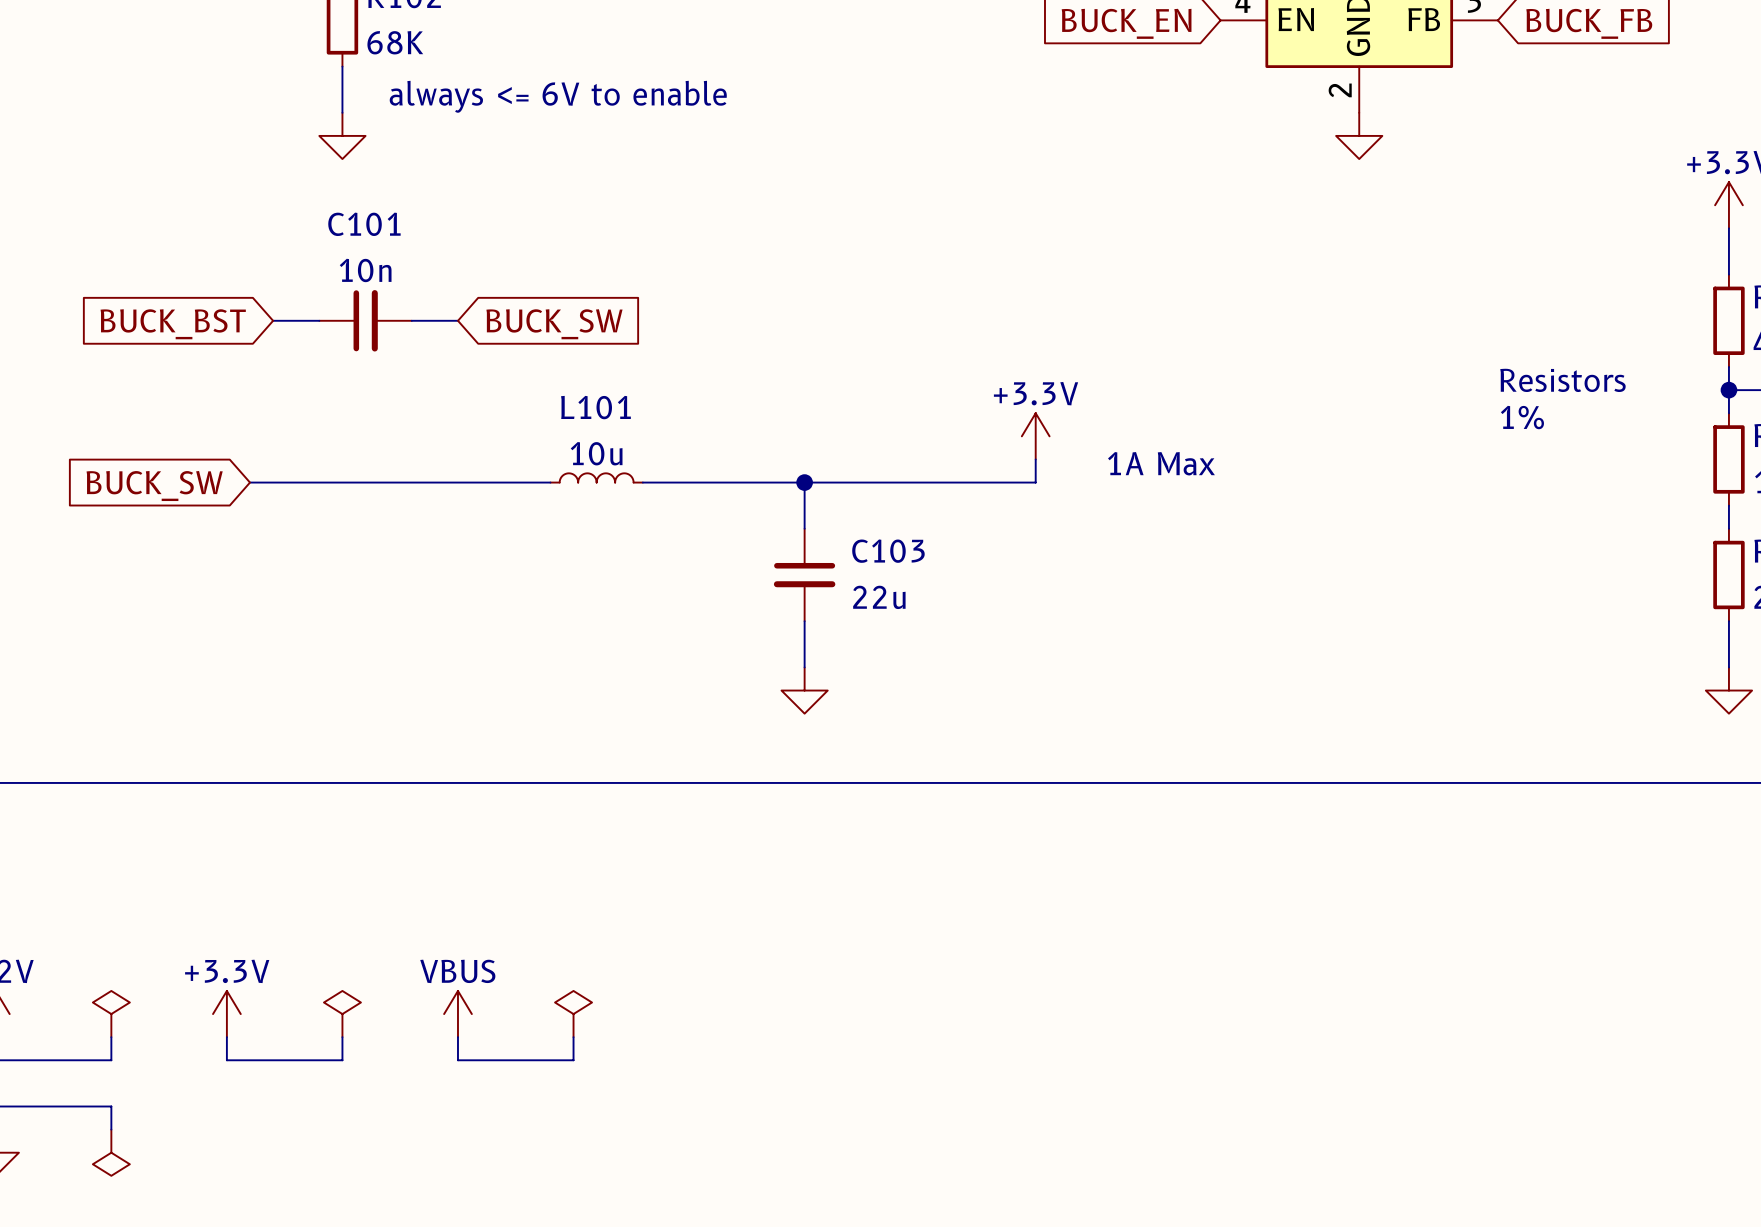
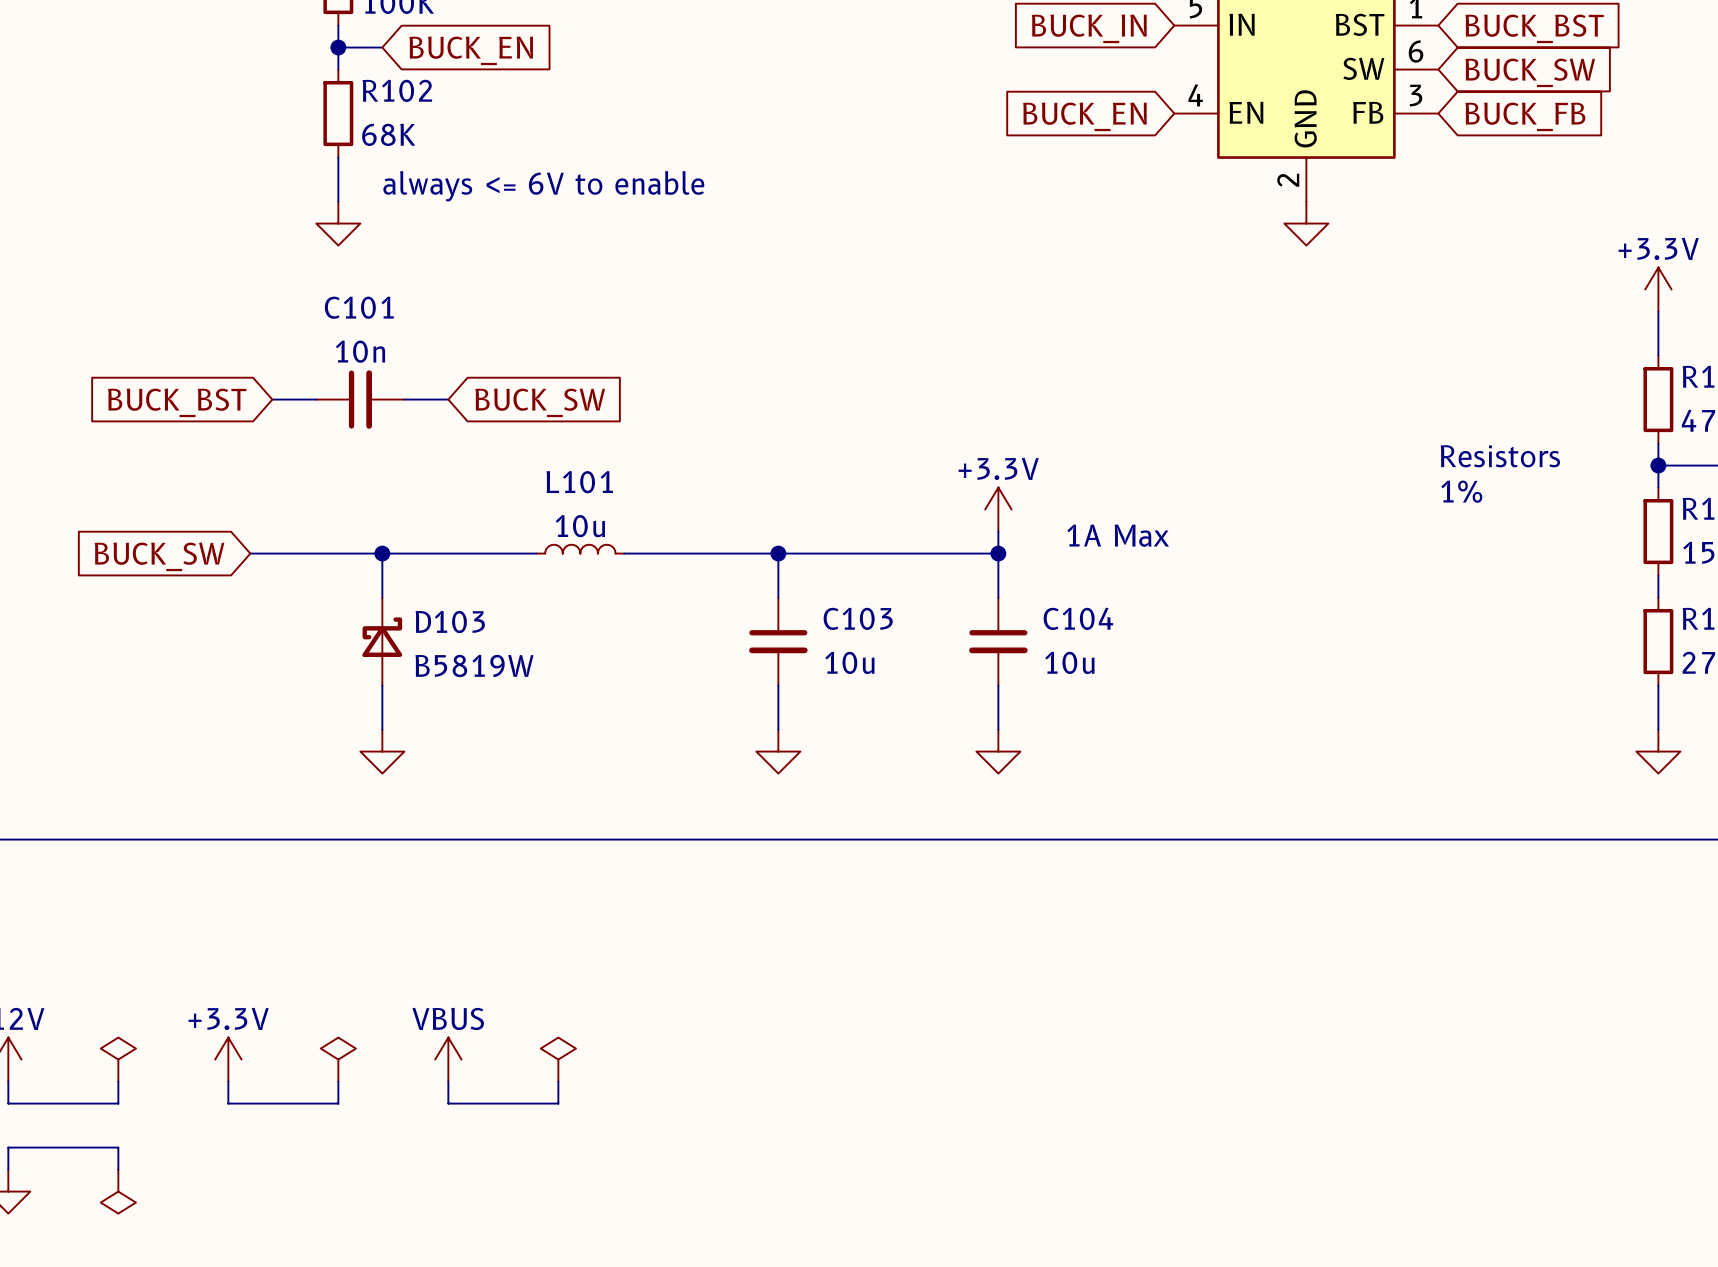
wire: none -> (382, 553) (382, 597)
junction: none -> (382, 553)
wire: none -> (998, 553) (998, 597)
junction: none -> (998, 553)
D103: none -> B5819W (382, 641)
C104: none -> 10u (998, 641)
C103 value: 22u (879, 597) -> 10u (849, 662)
wire: none -> (382, 685) (382, 729)
wire: none -> (998, 685) (998, 729)
power symbol: none -> (382, 751)
power symbol: none -> (998, 751)

